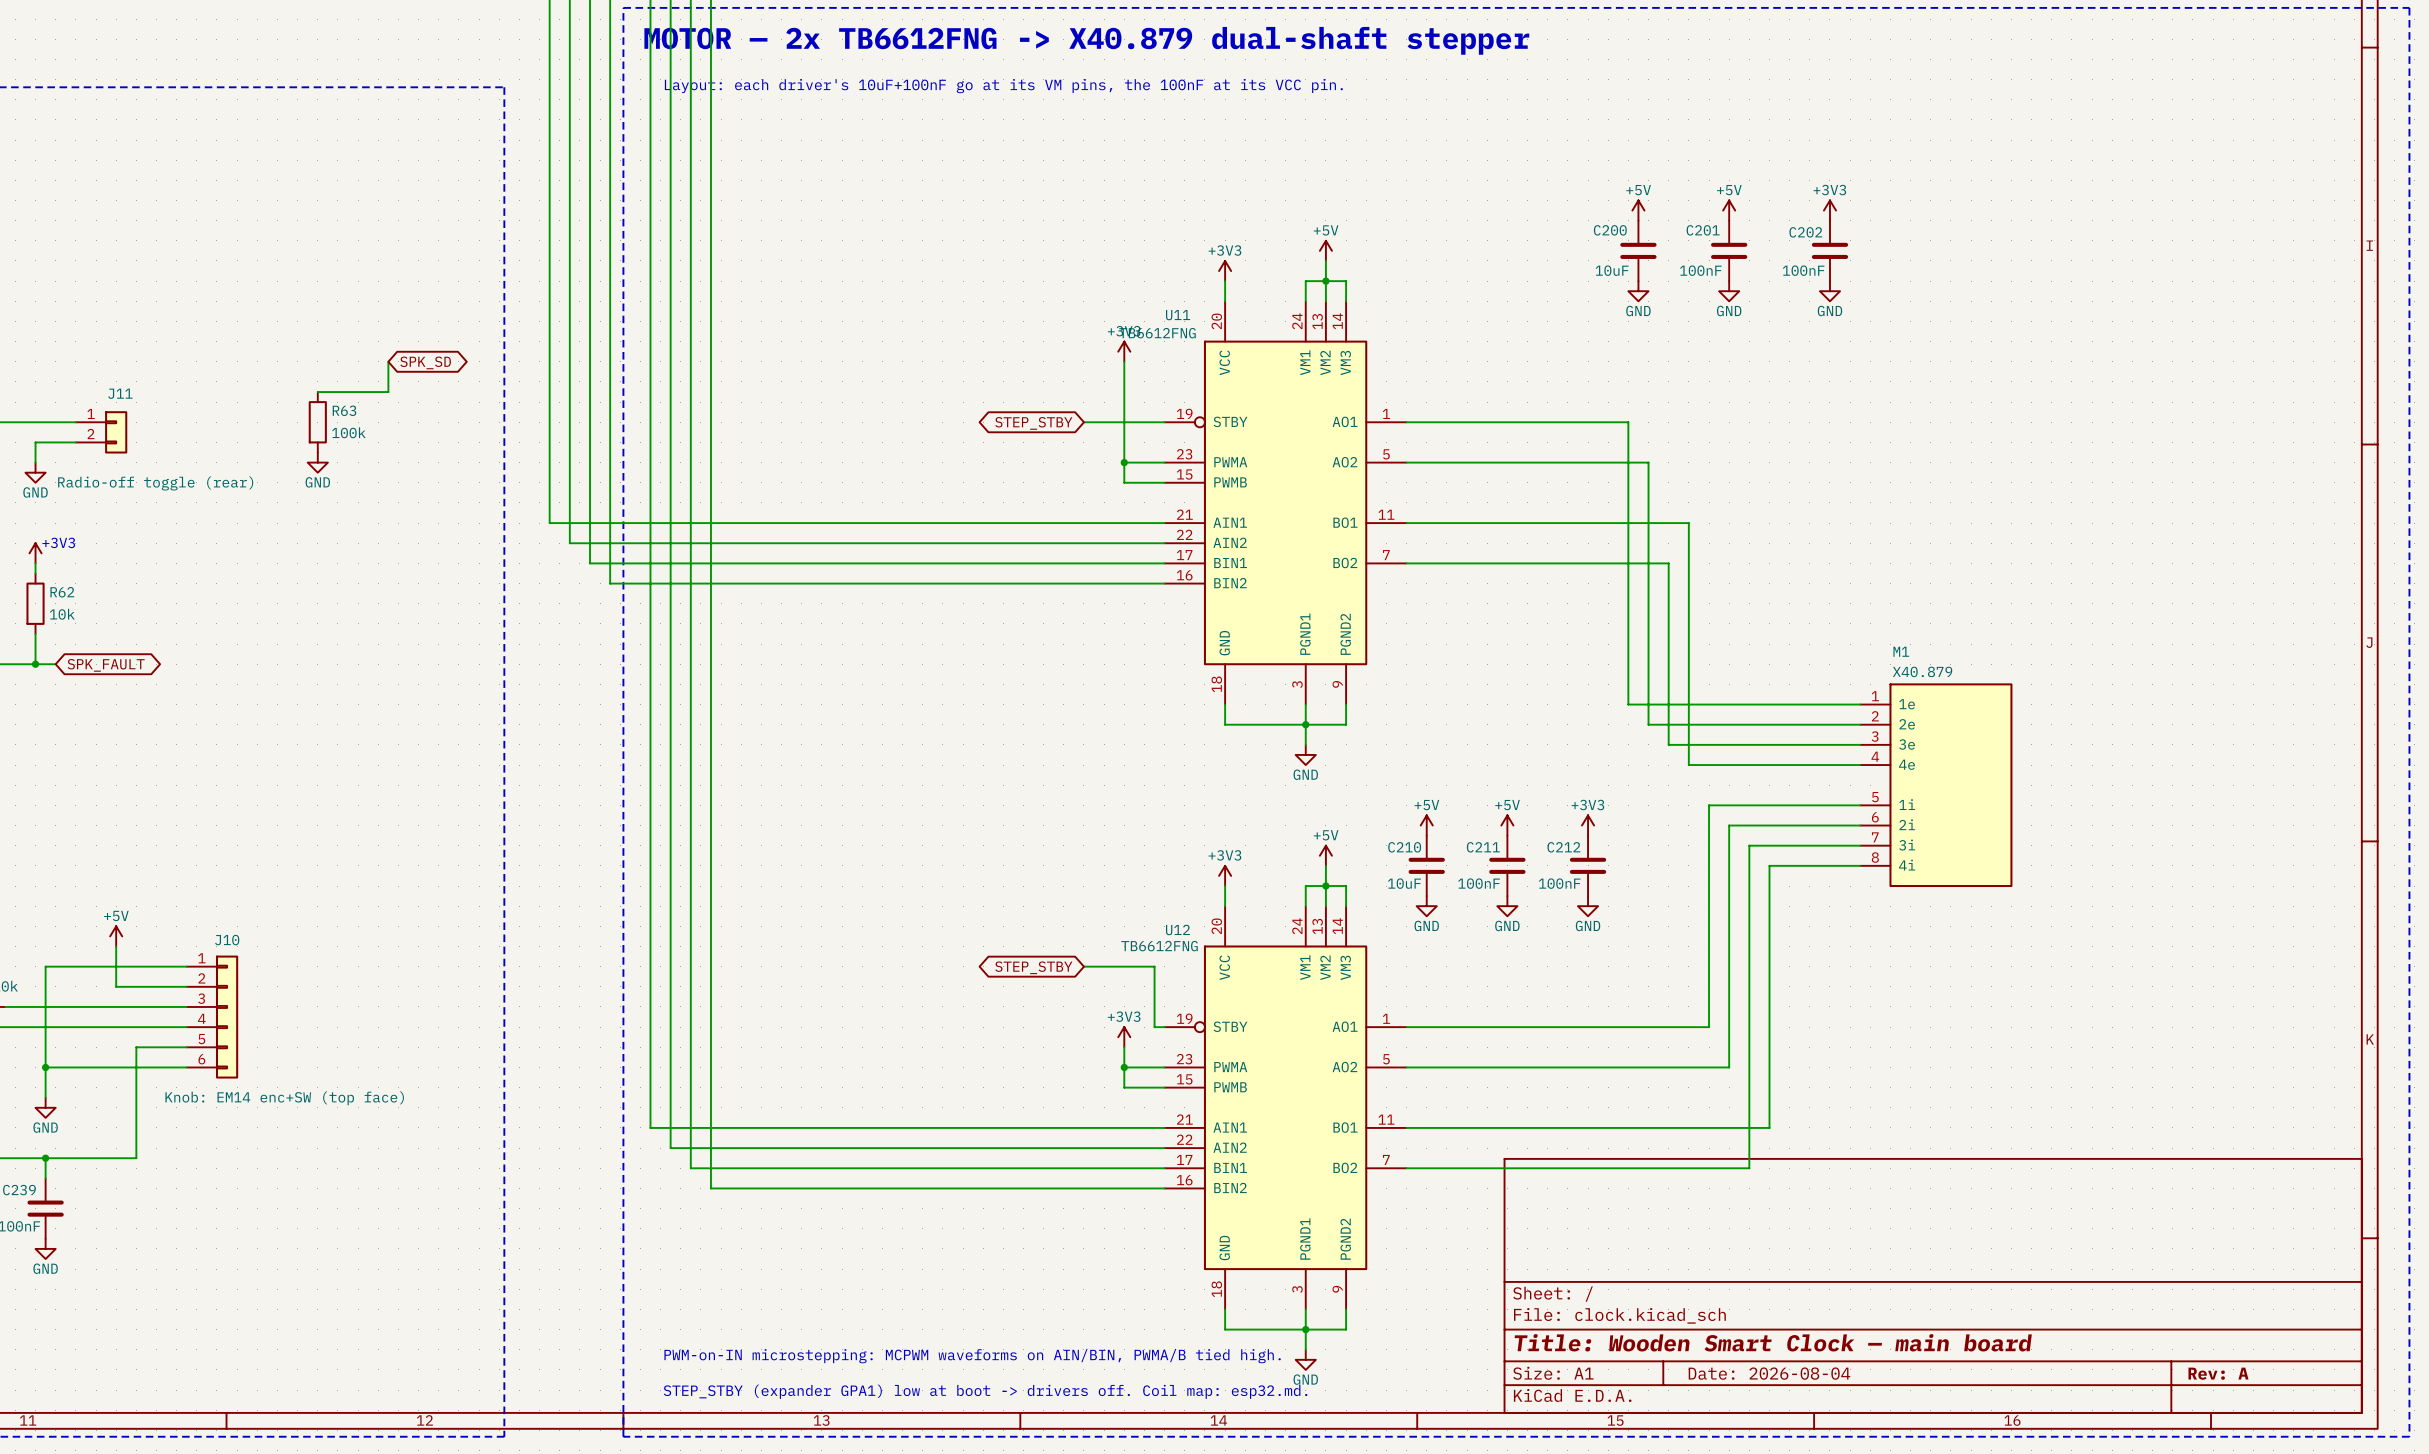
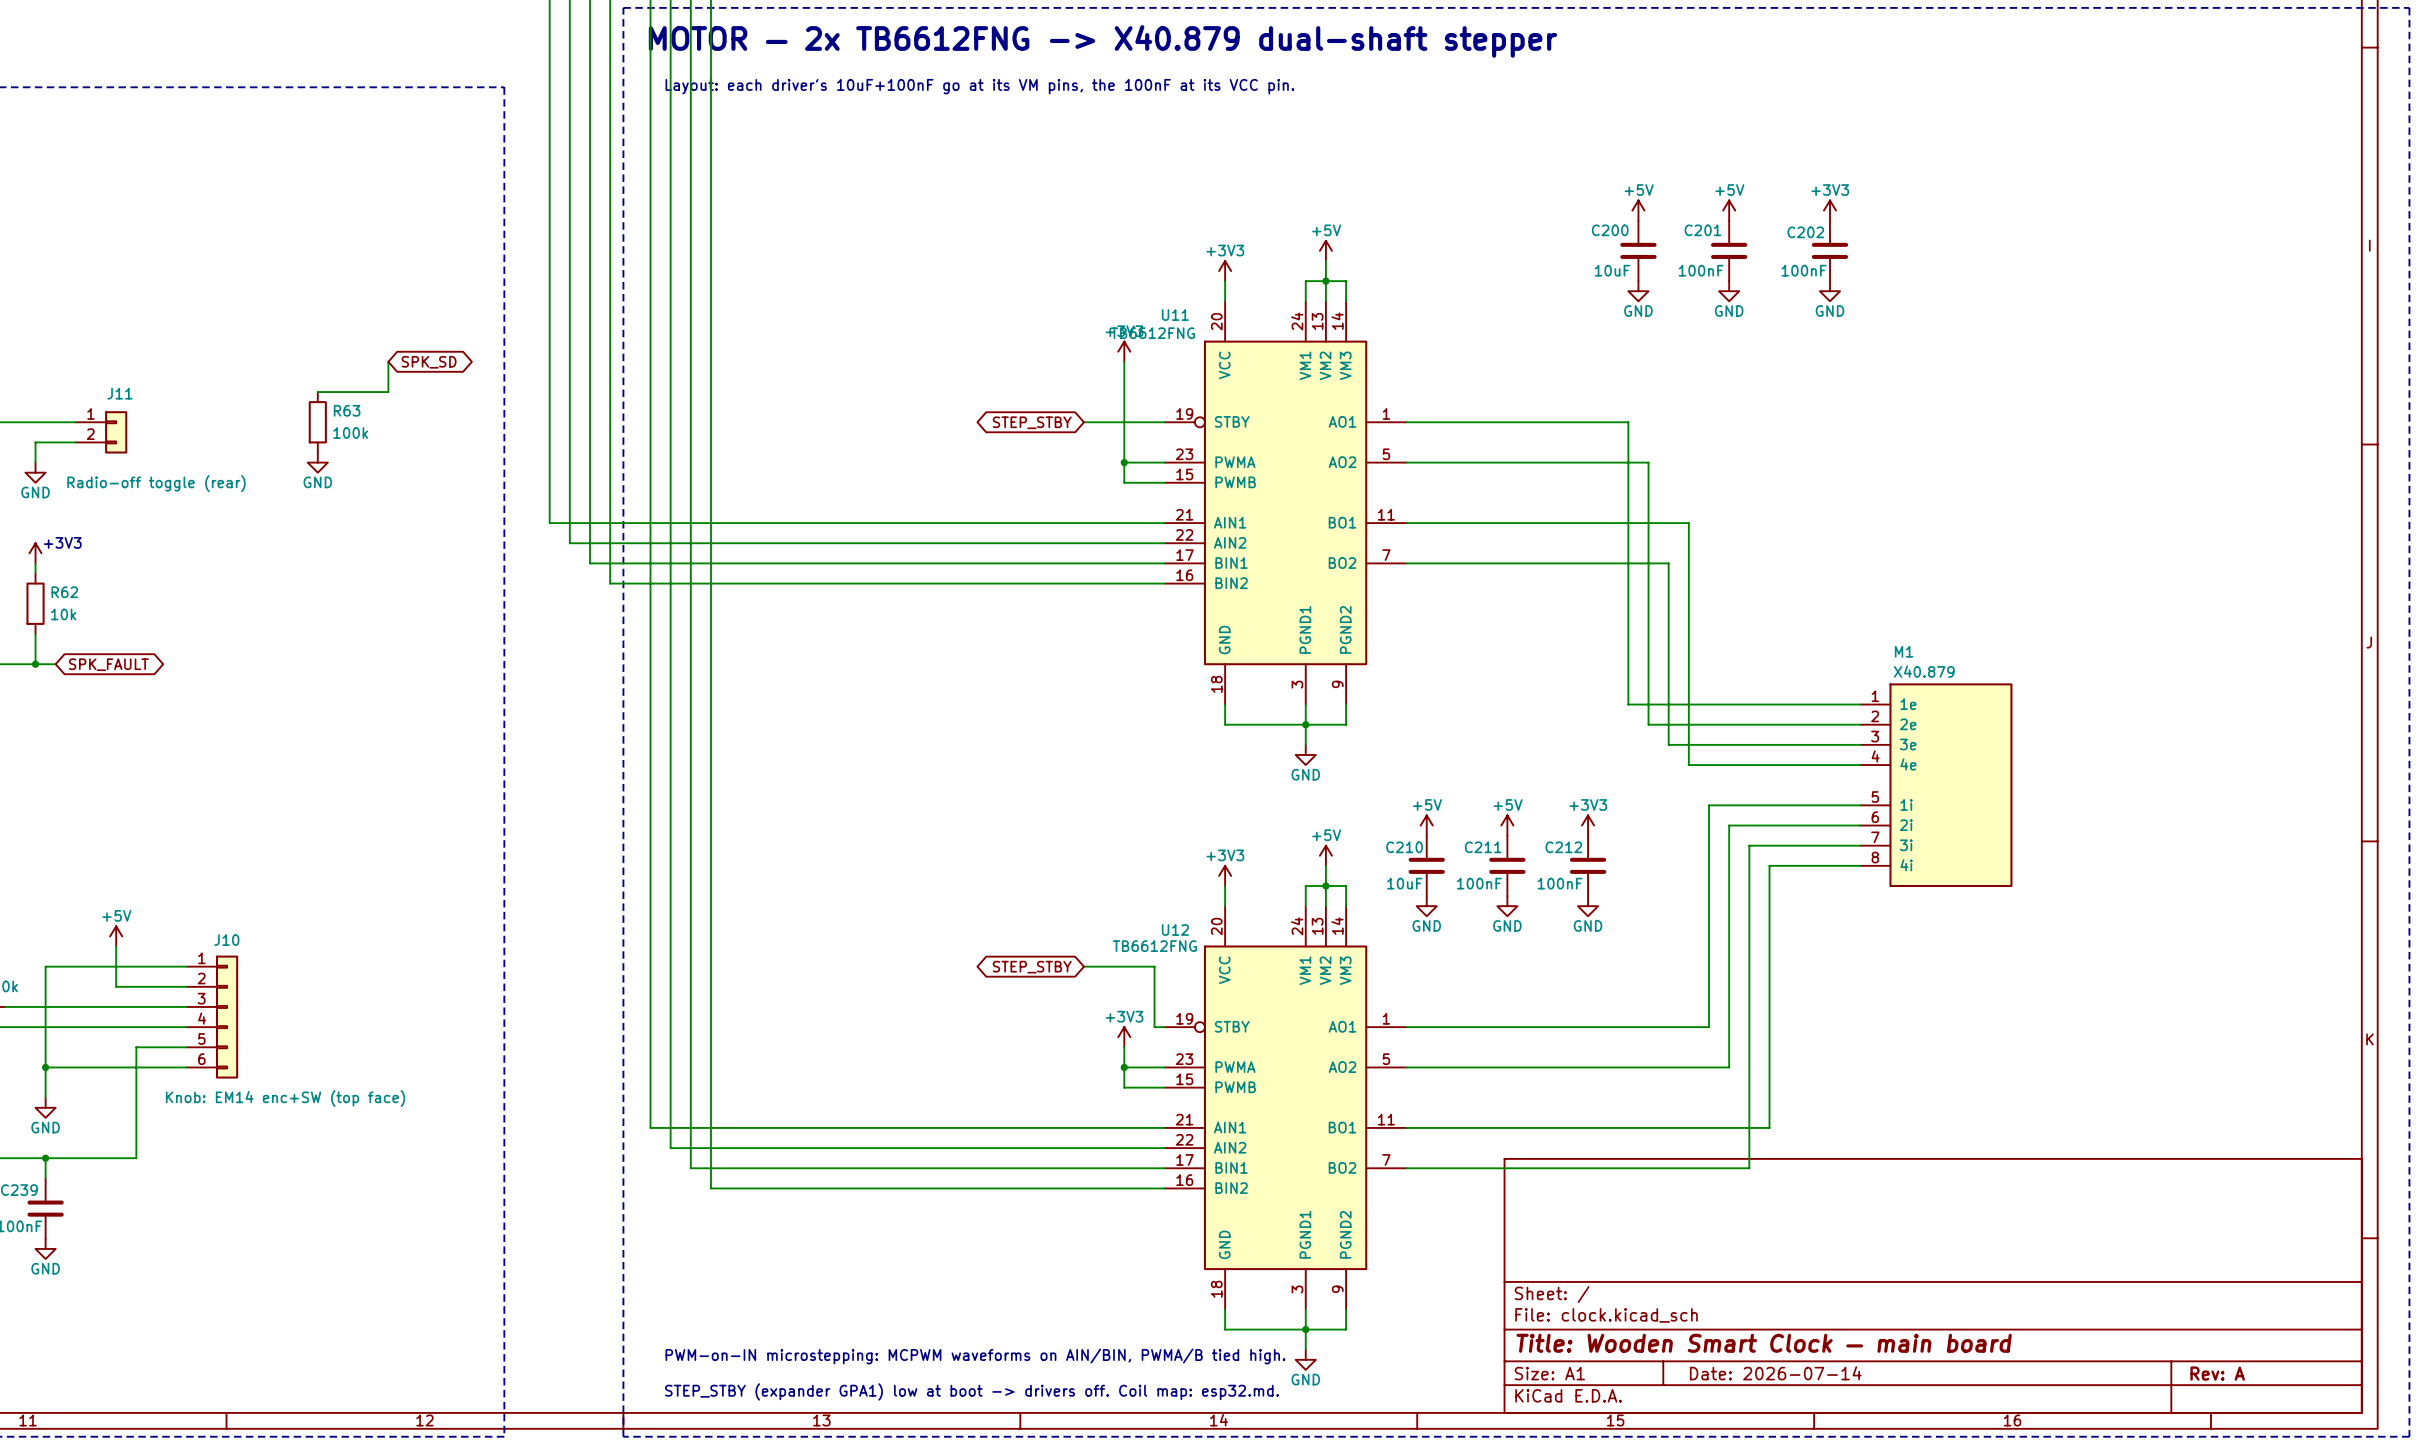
title block: Date: 2026-08-04 (1769, 1373) -> Date: 2026-07-14 (1775, 1373)

